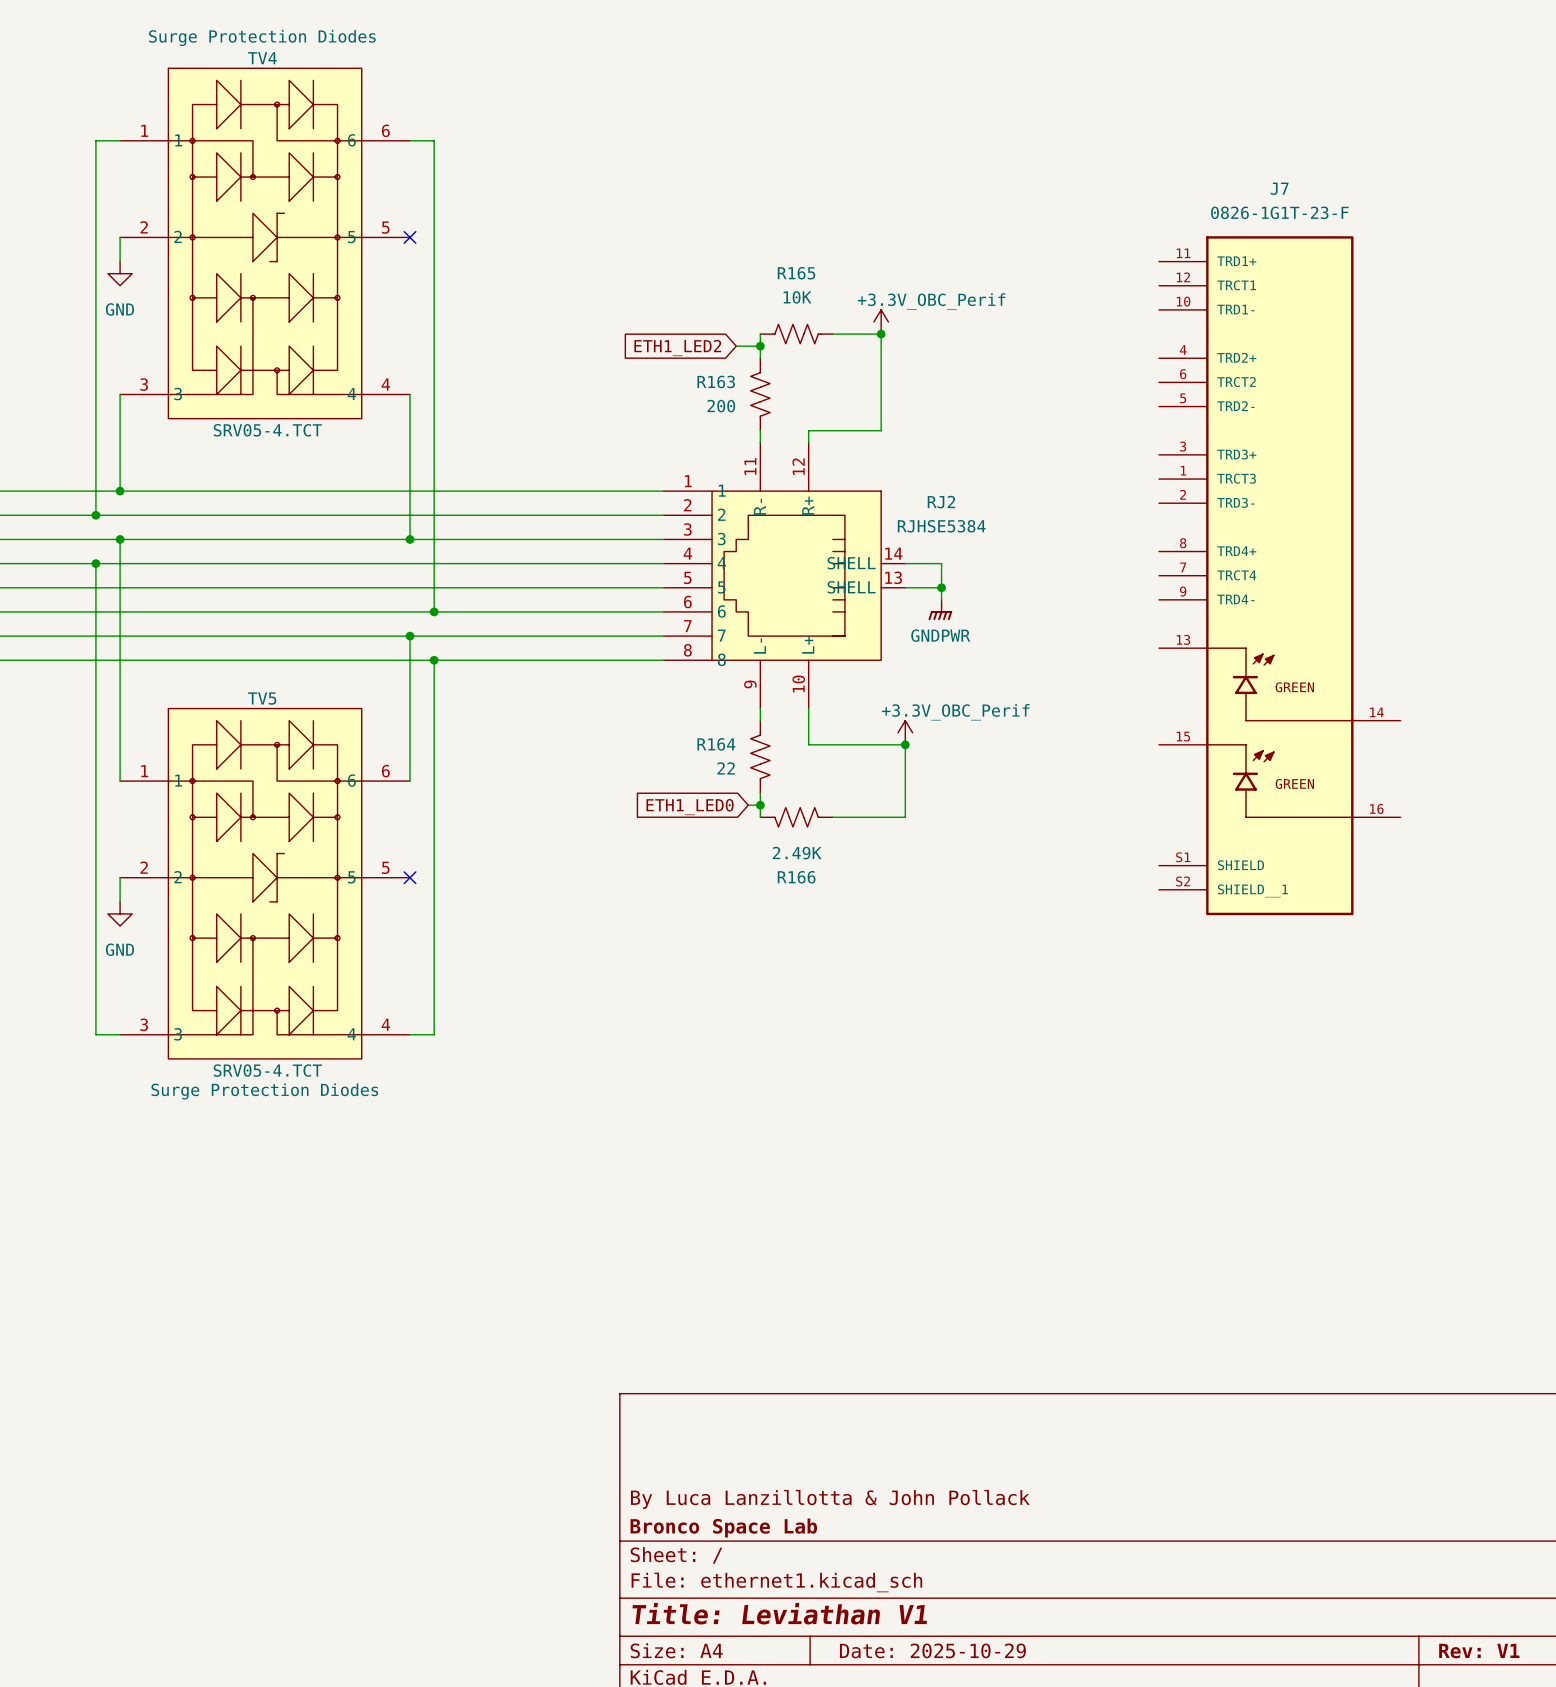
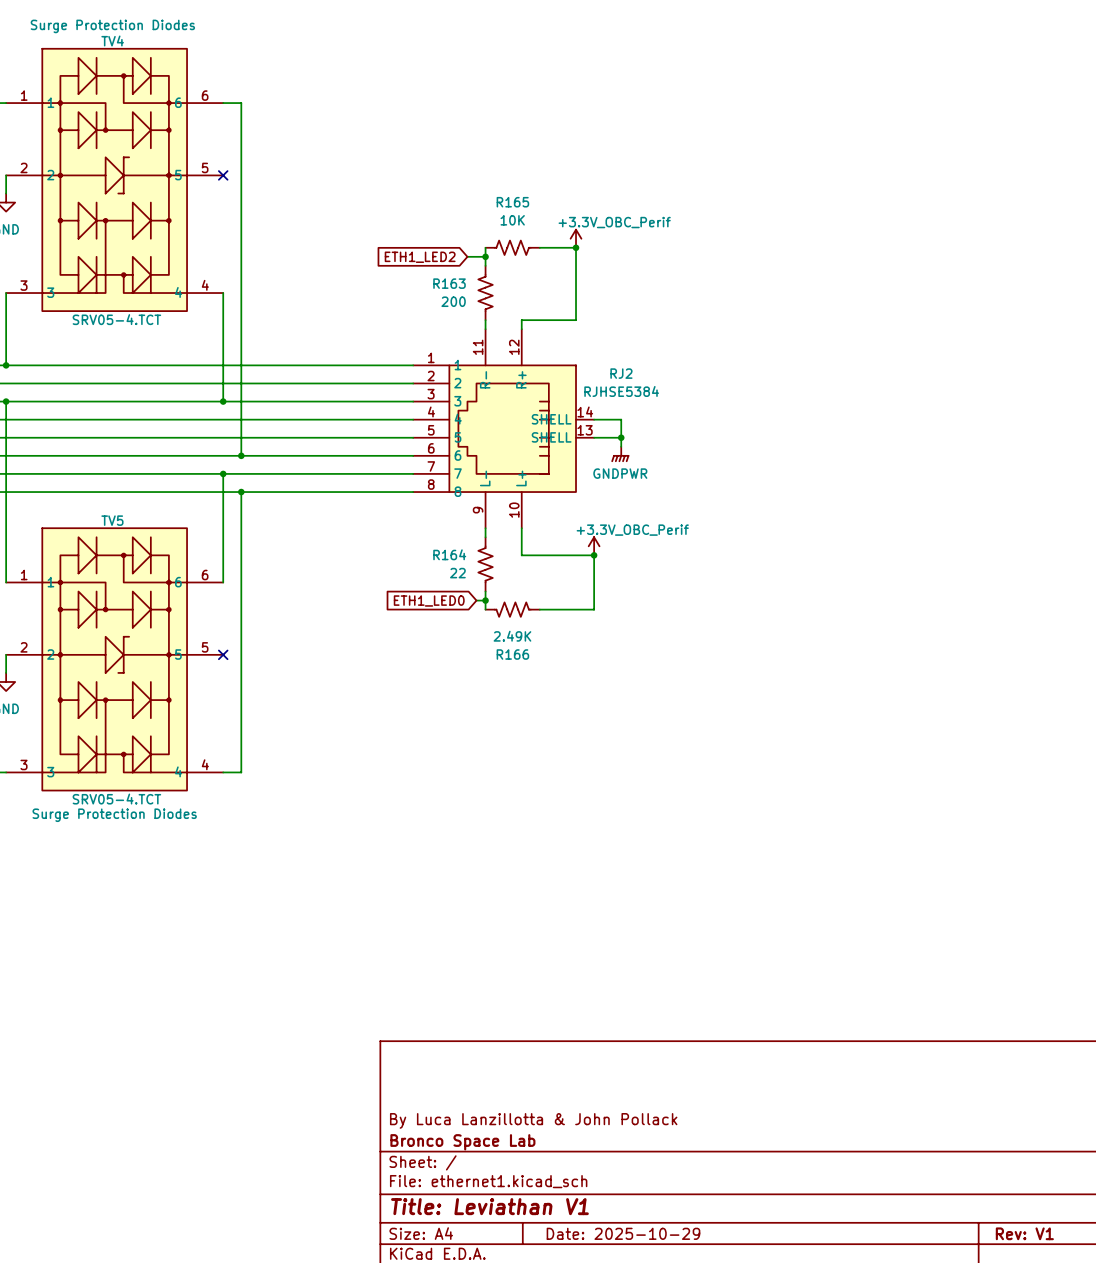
J7: 0826-1G1T-23-F (1279, 575) -> none

